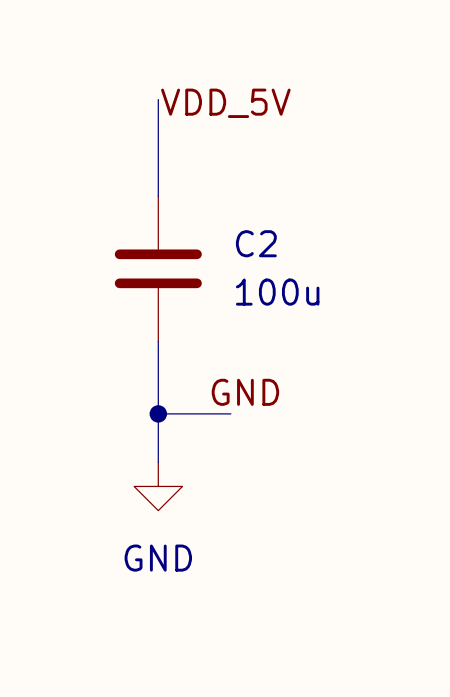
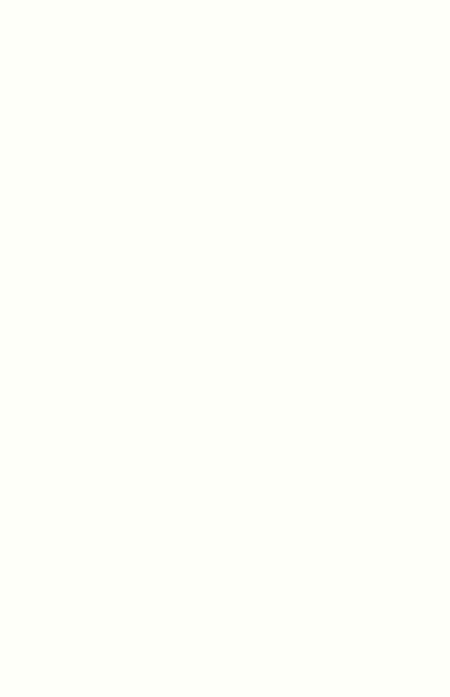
wire: (158, 99) (158, 196) -> none
label: VDD_5V (225, 103) -> none
C2: 100u (158, 268) -> none
wire: (158, 341) (158, 462) -> none
label: GND (245, 392) -> none
wire: (158, 413) (230, 413) -> none
junction: (158, 413) -> none
power symbol: GND (158, 486) -> none

